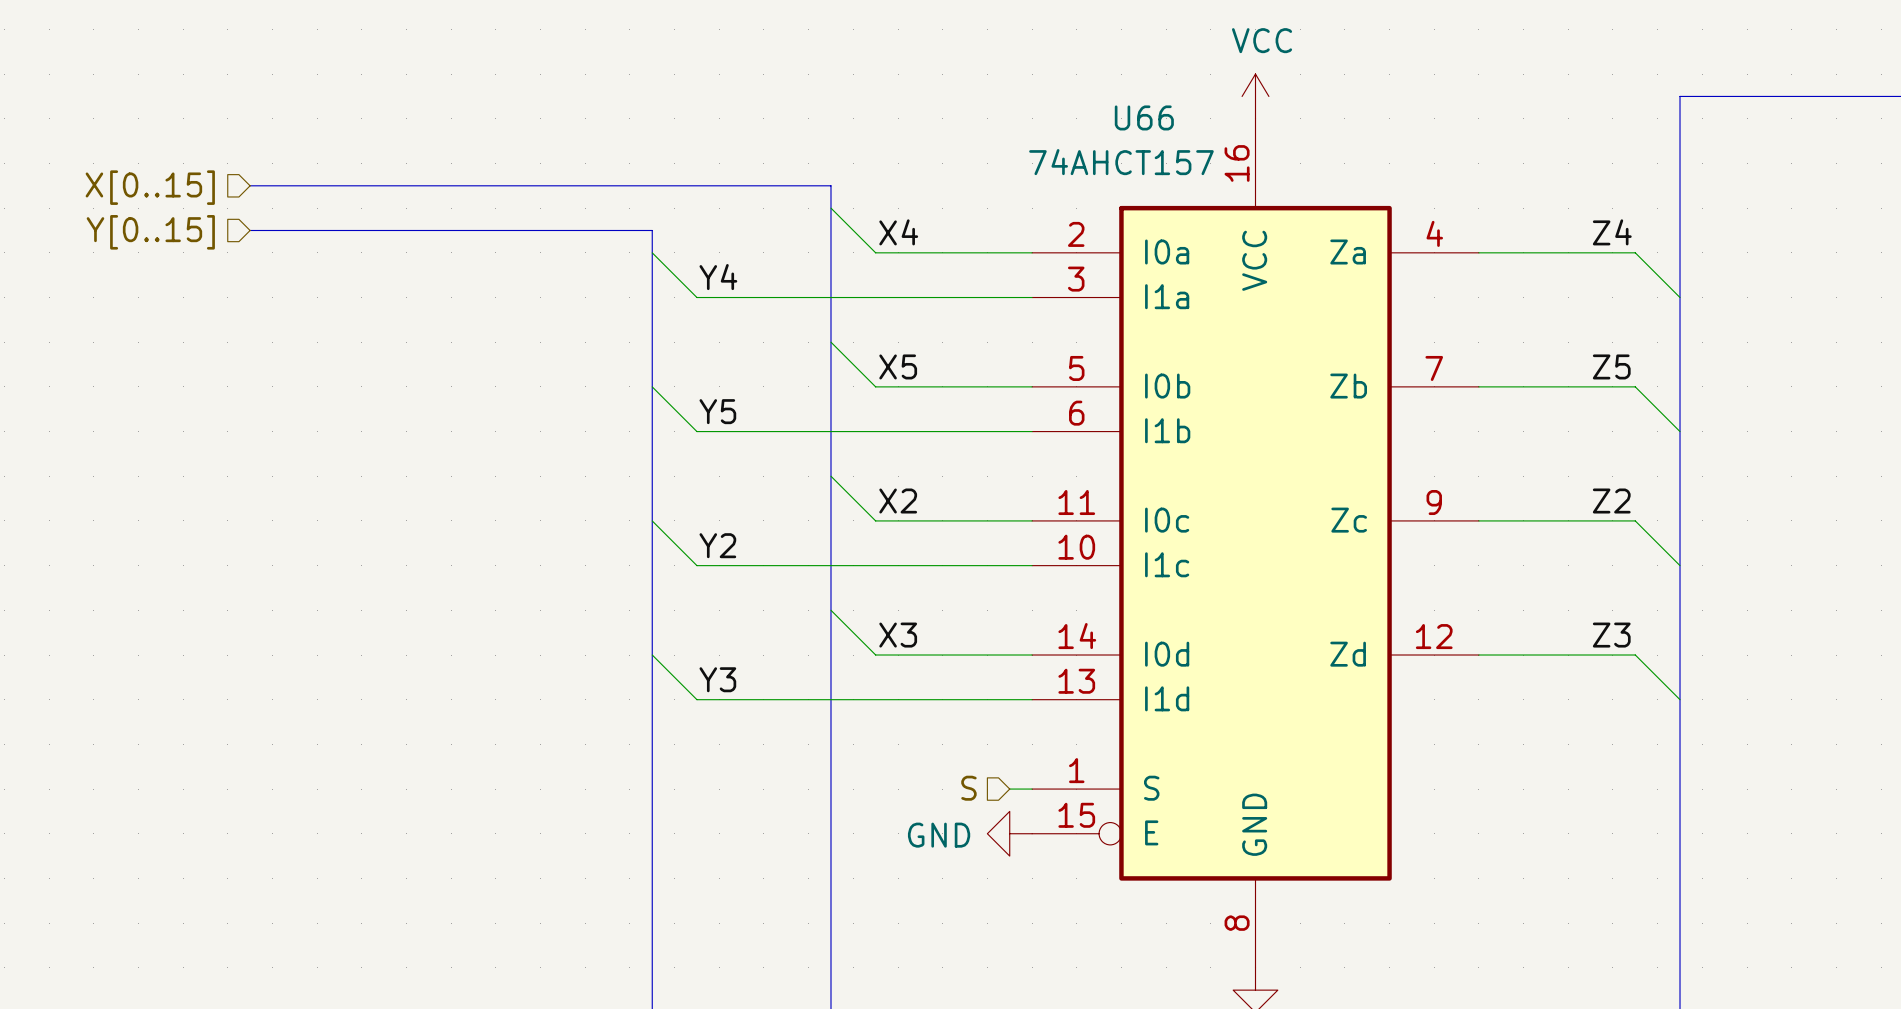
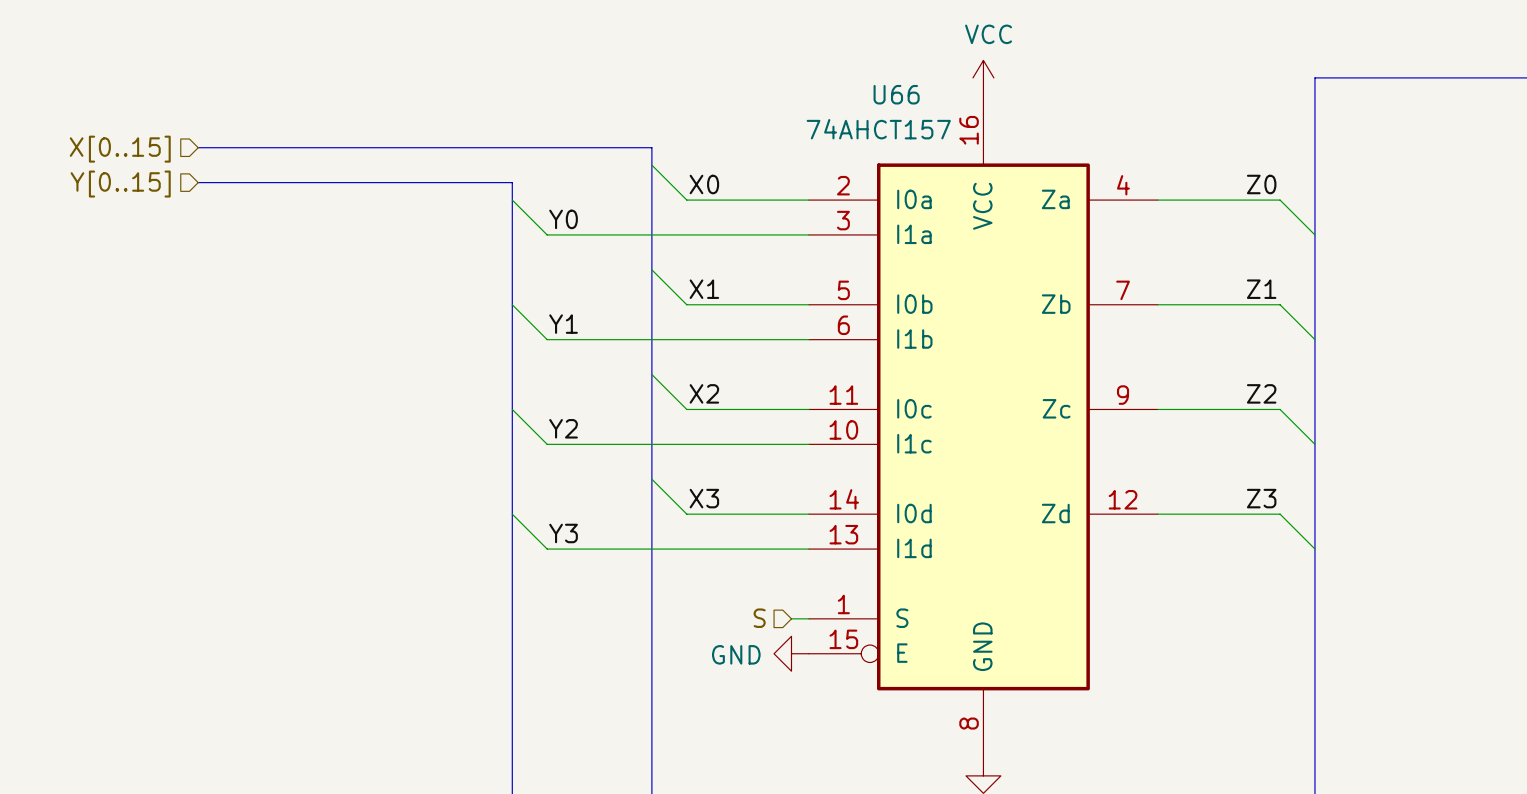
label: X4 (898, 232) -> X0 (704, 184)
label: Z4 (1612, 232) -> Z0 (1261, 184)
label: Y4 (718, 277) -> Y0 (563, 219)
label: X5 (898, 366) -> X1 (704, 289)
label: Z5 (1611, 366) -> Z1 (1261, 289)
label: Y5 (717, 411) -> Y1 (563, 324)

